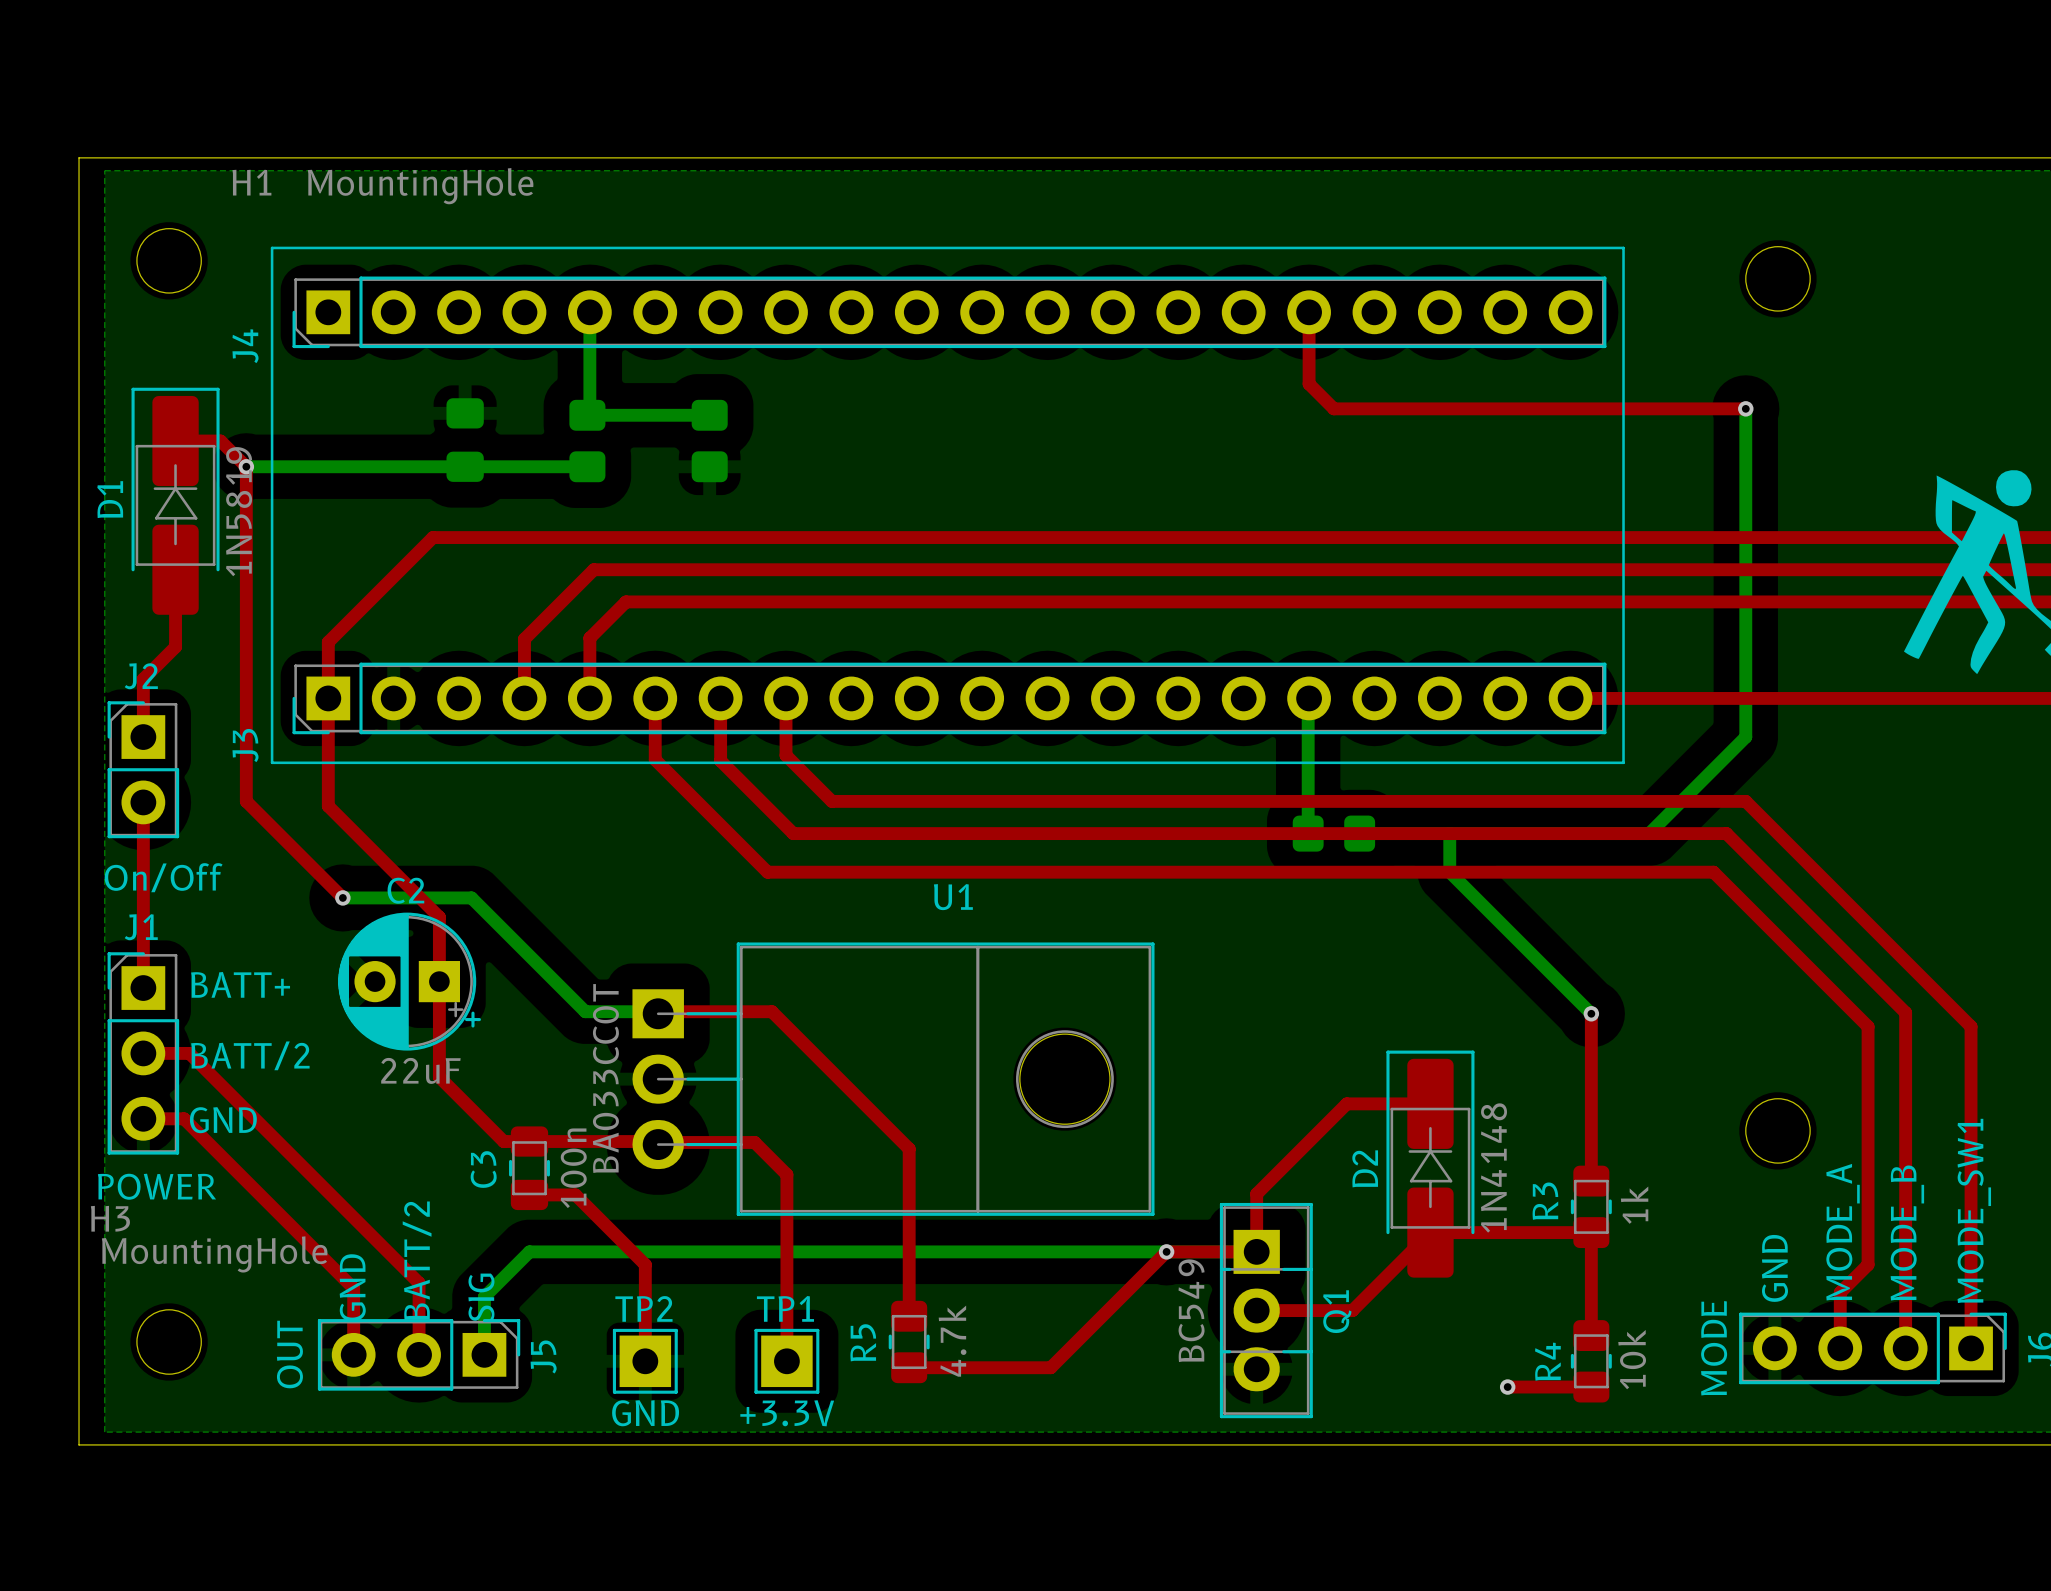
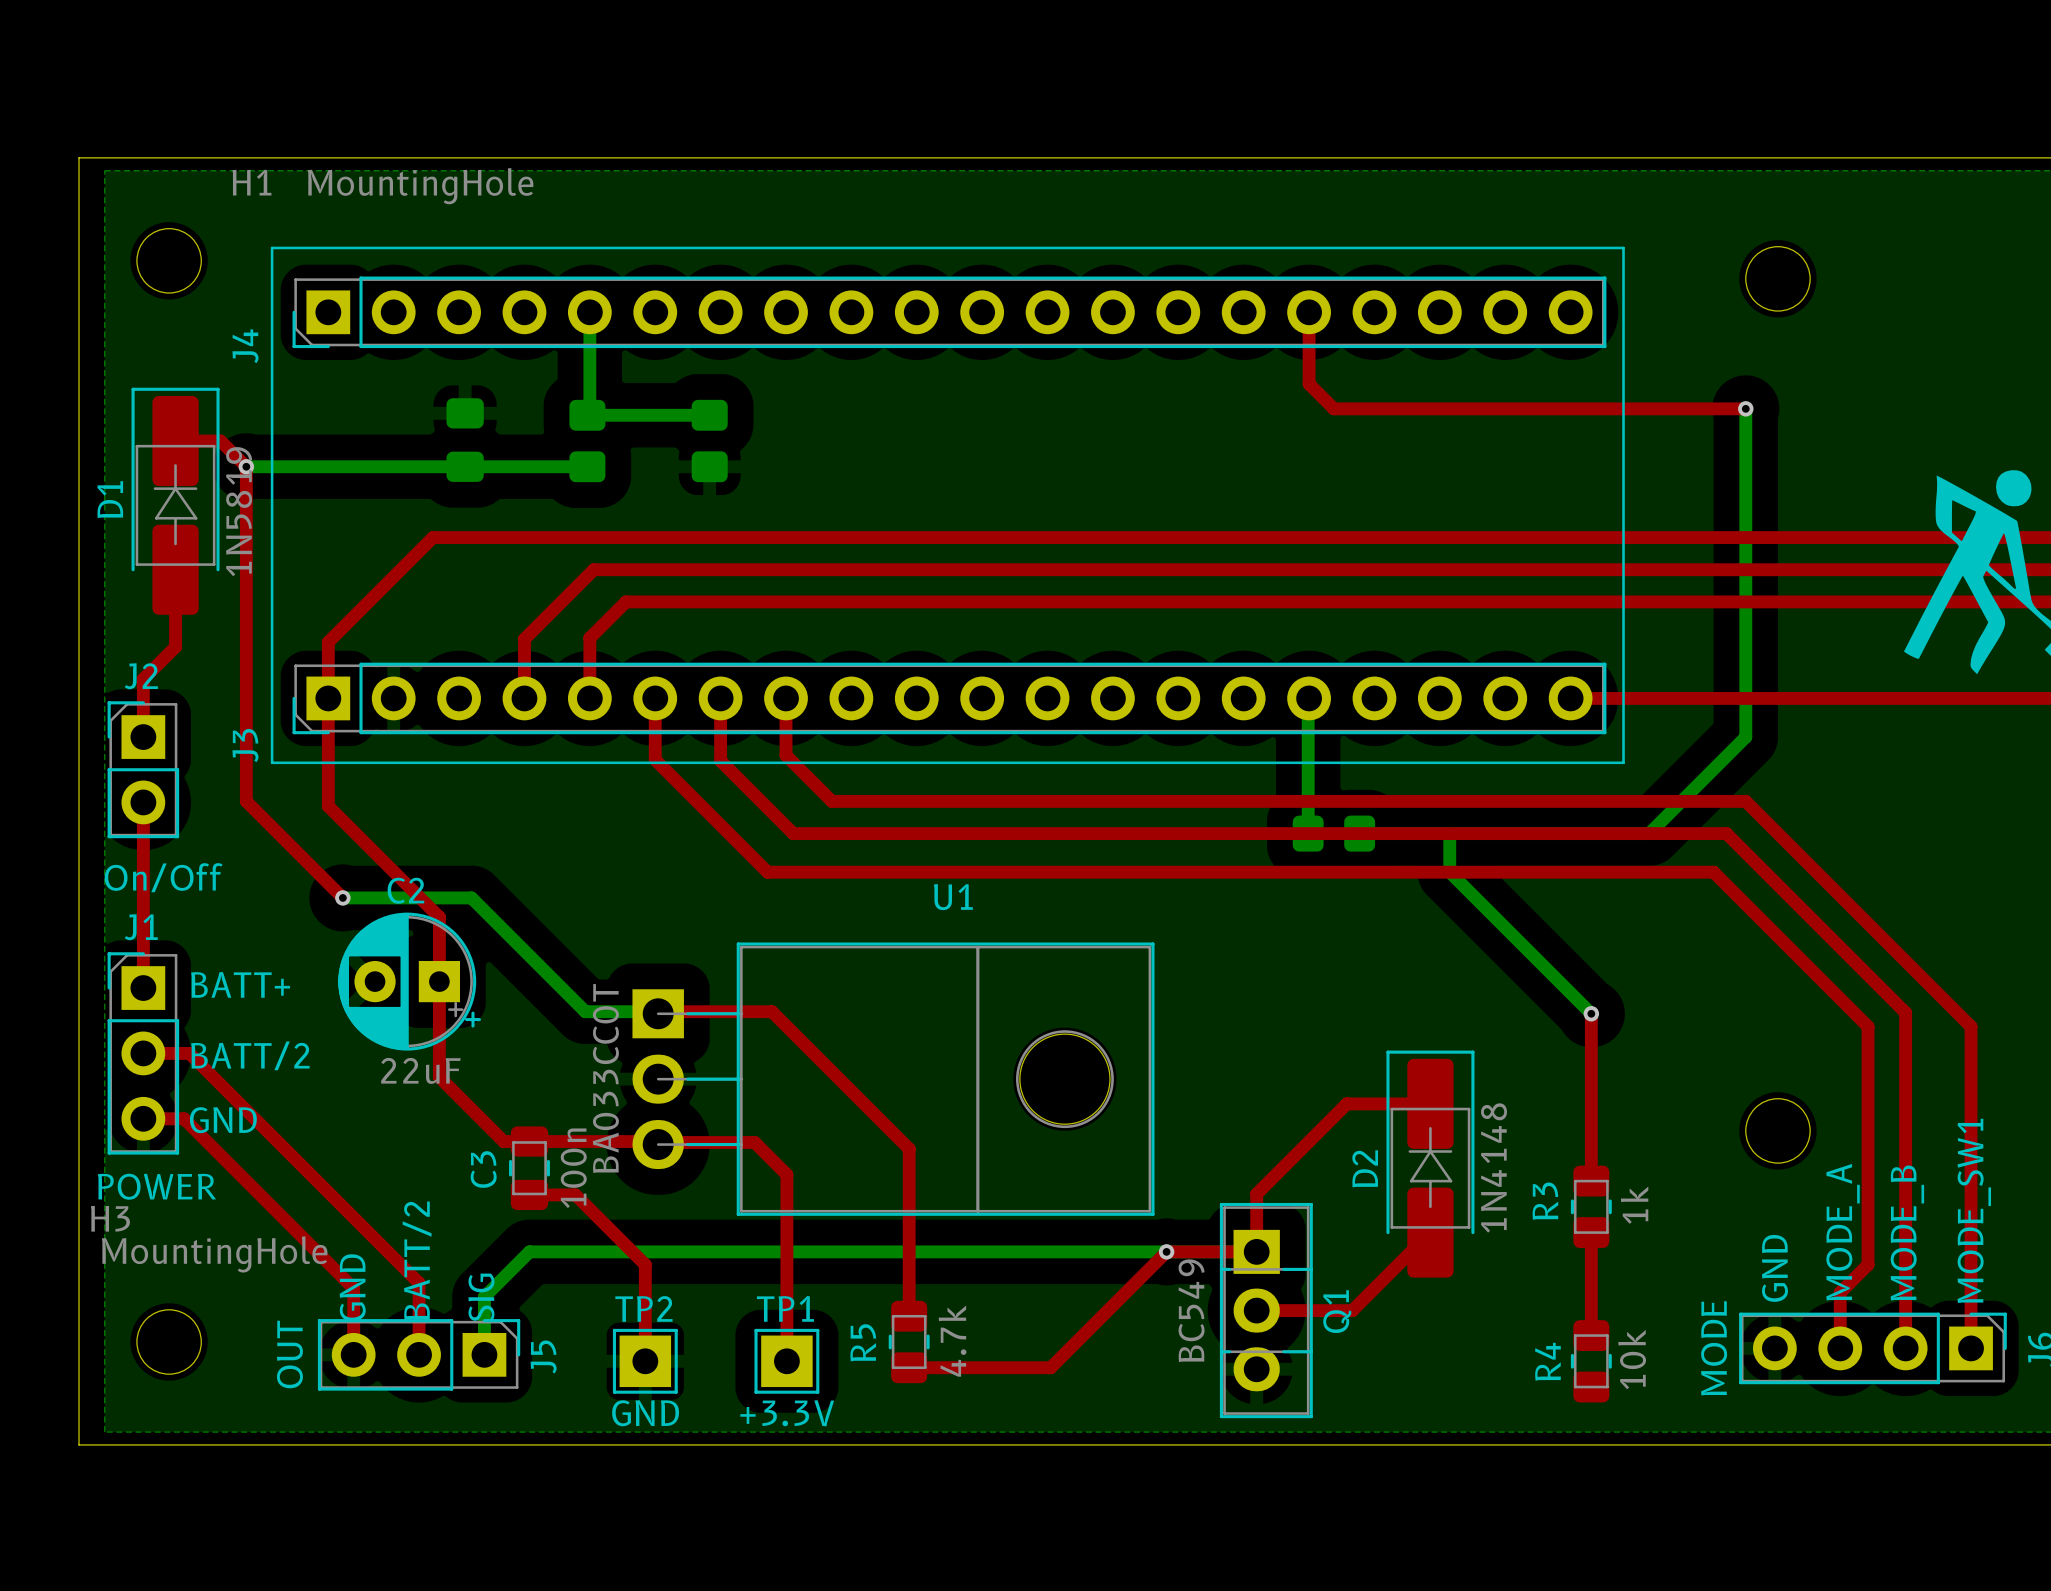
top track: (1430, 1232) (1591, 1232) -> none
top track: (1507, 1387) (1591, 1387) -> none
via: (1507, 1387) -> none

